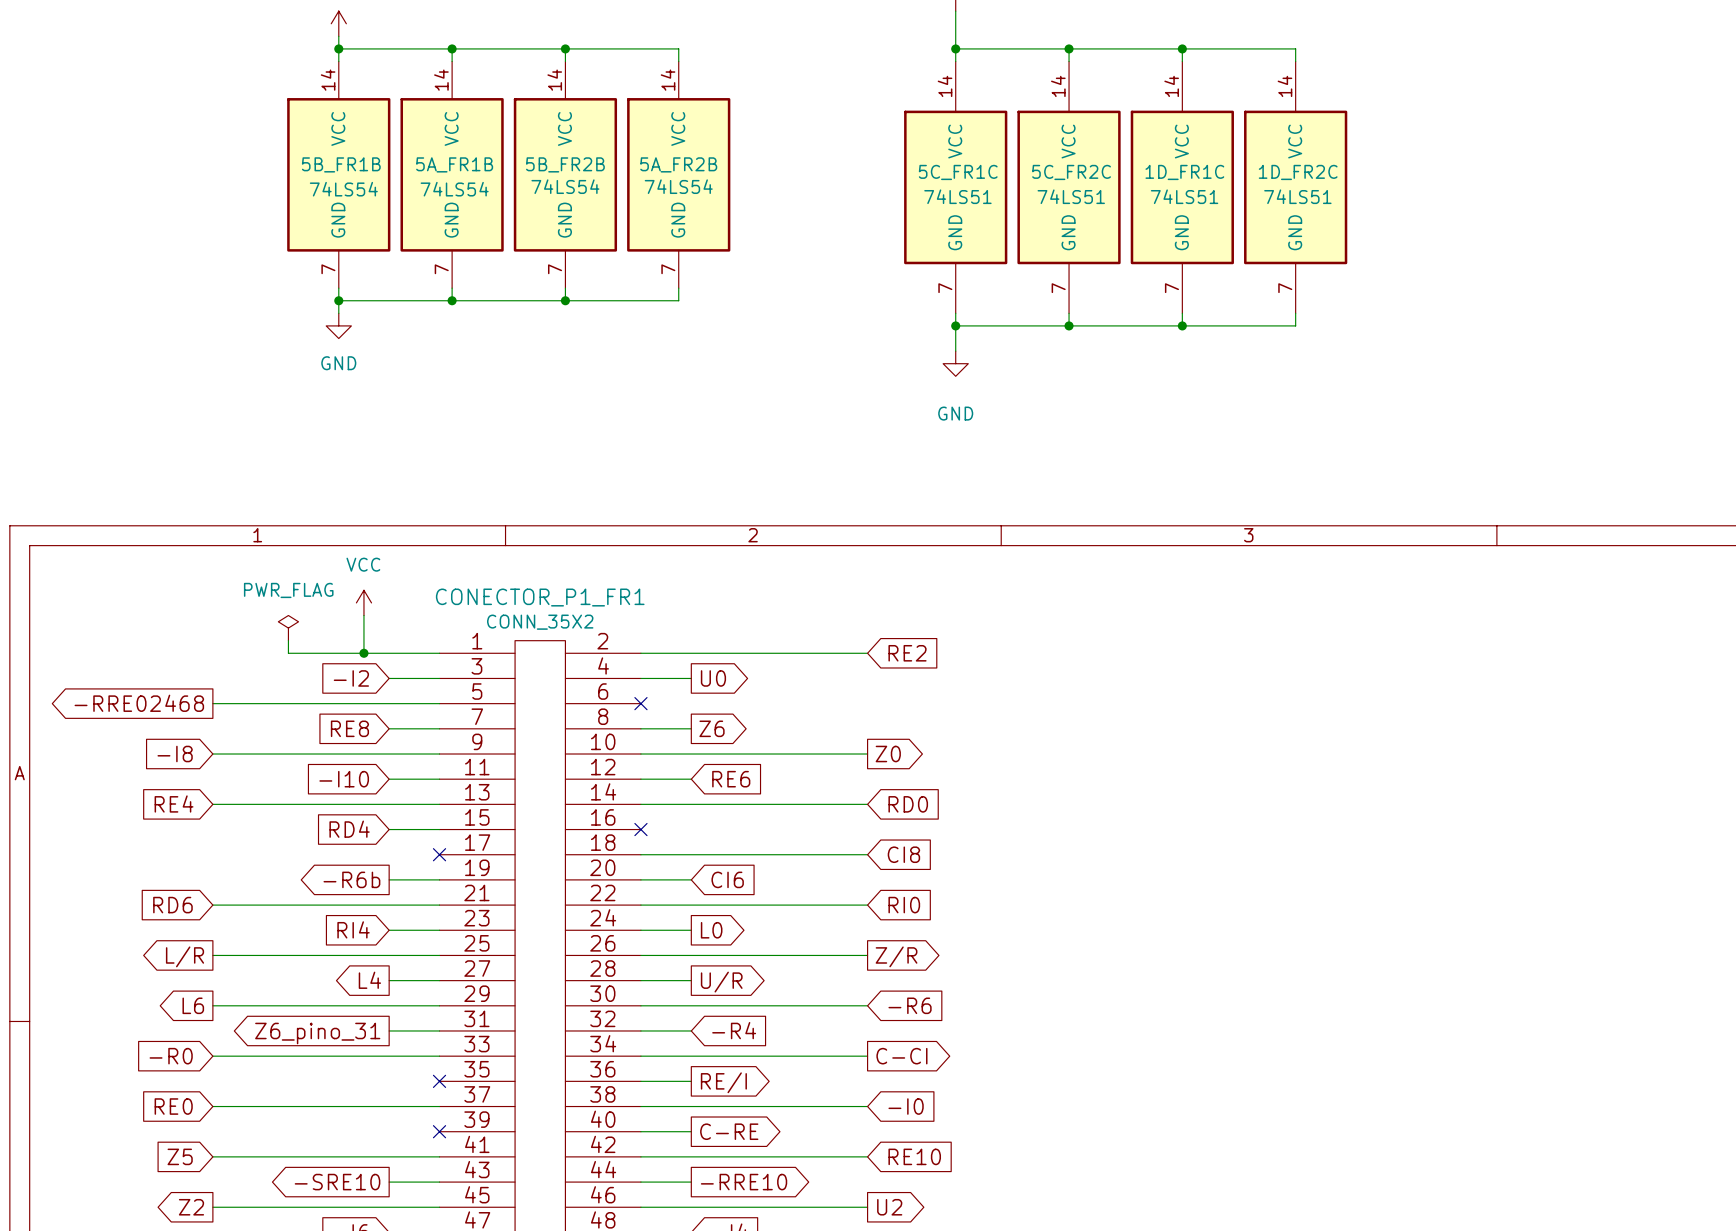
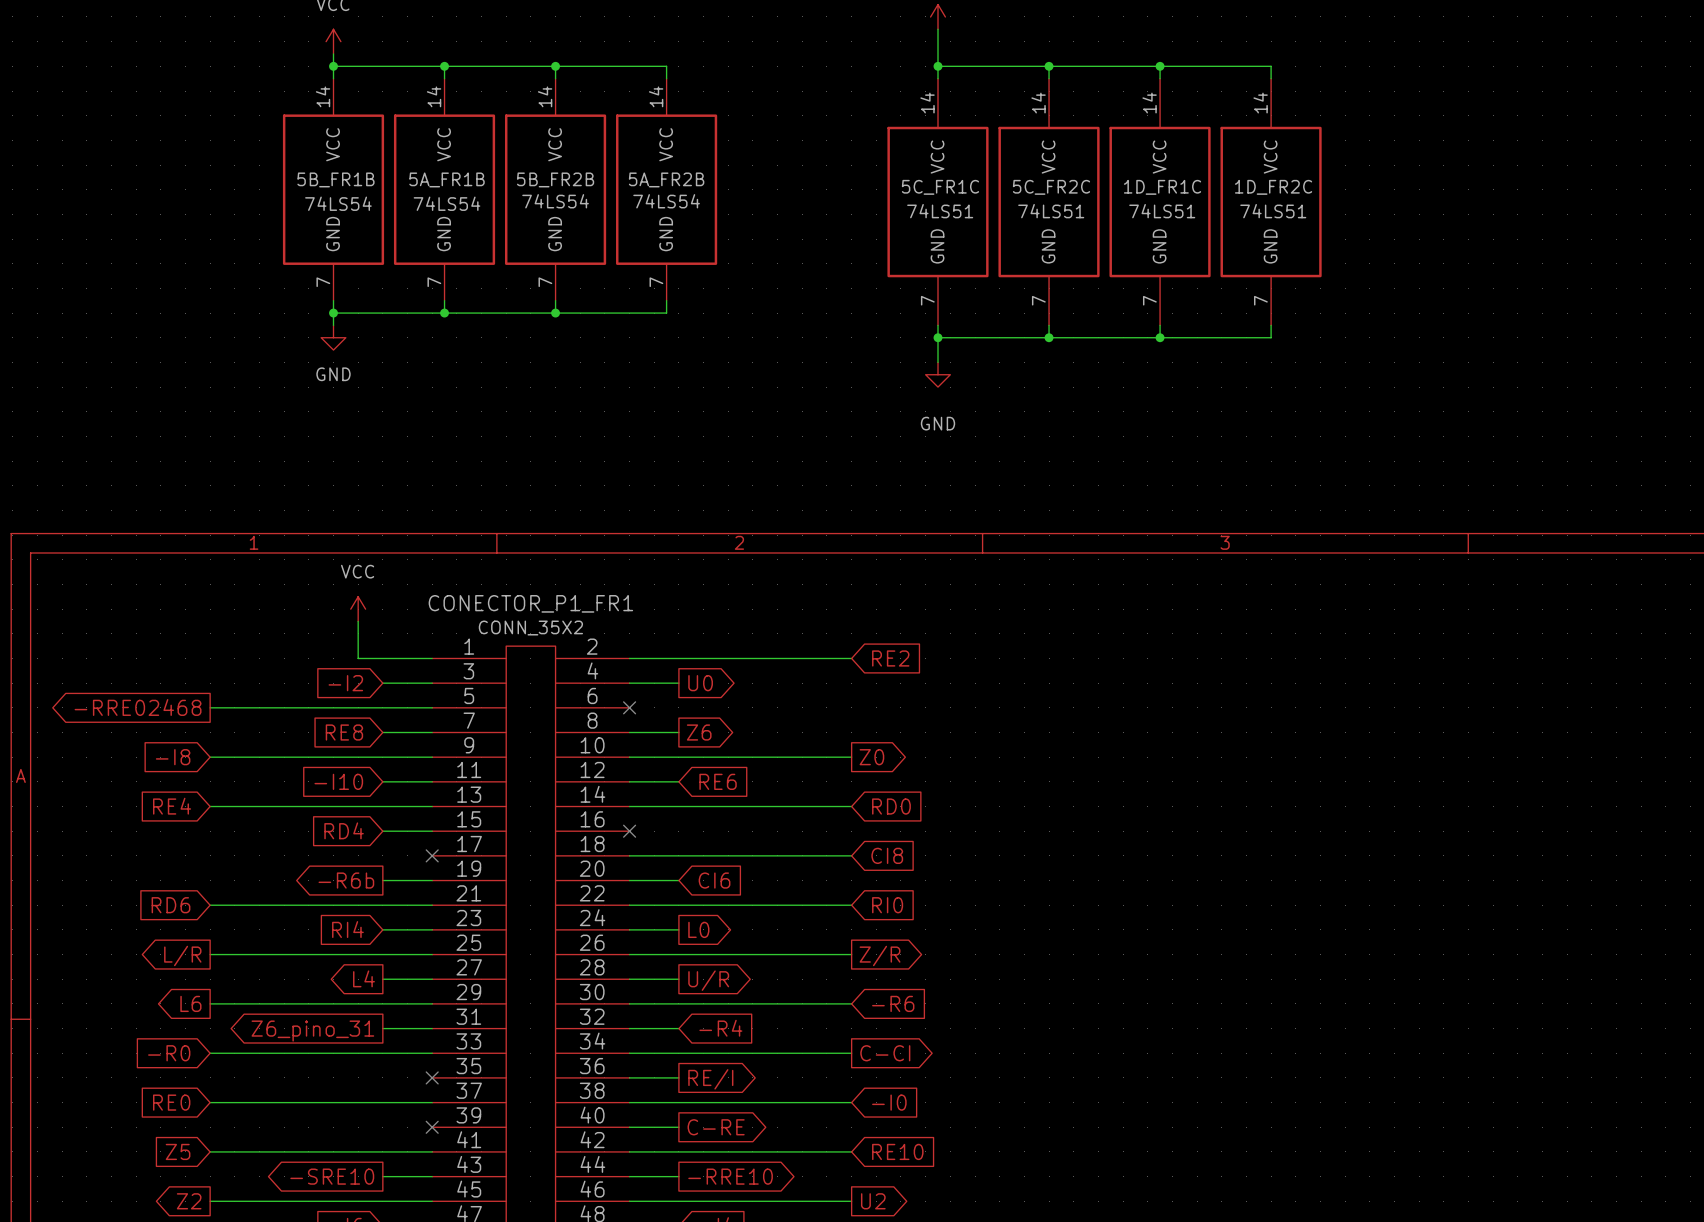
power symbol: PWR_FLAG (288, 628) -> none
wire: (288, 640) (288, 653) (363, 653) -> none
junction: (363, 653) -> none

